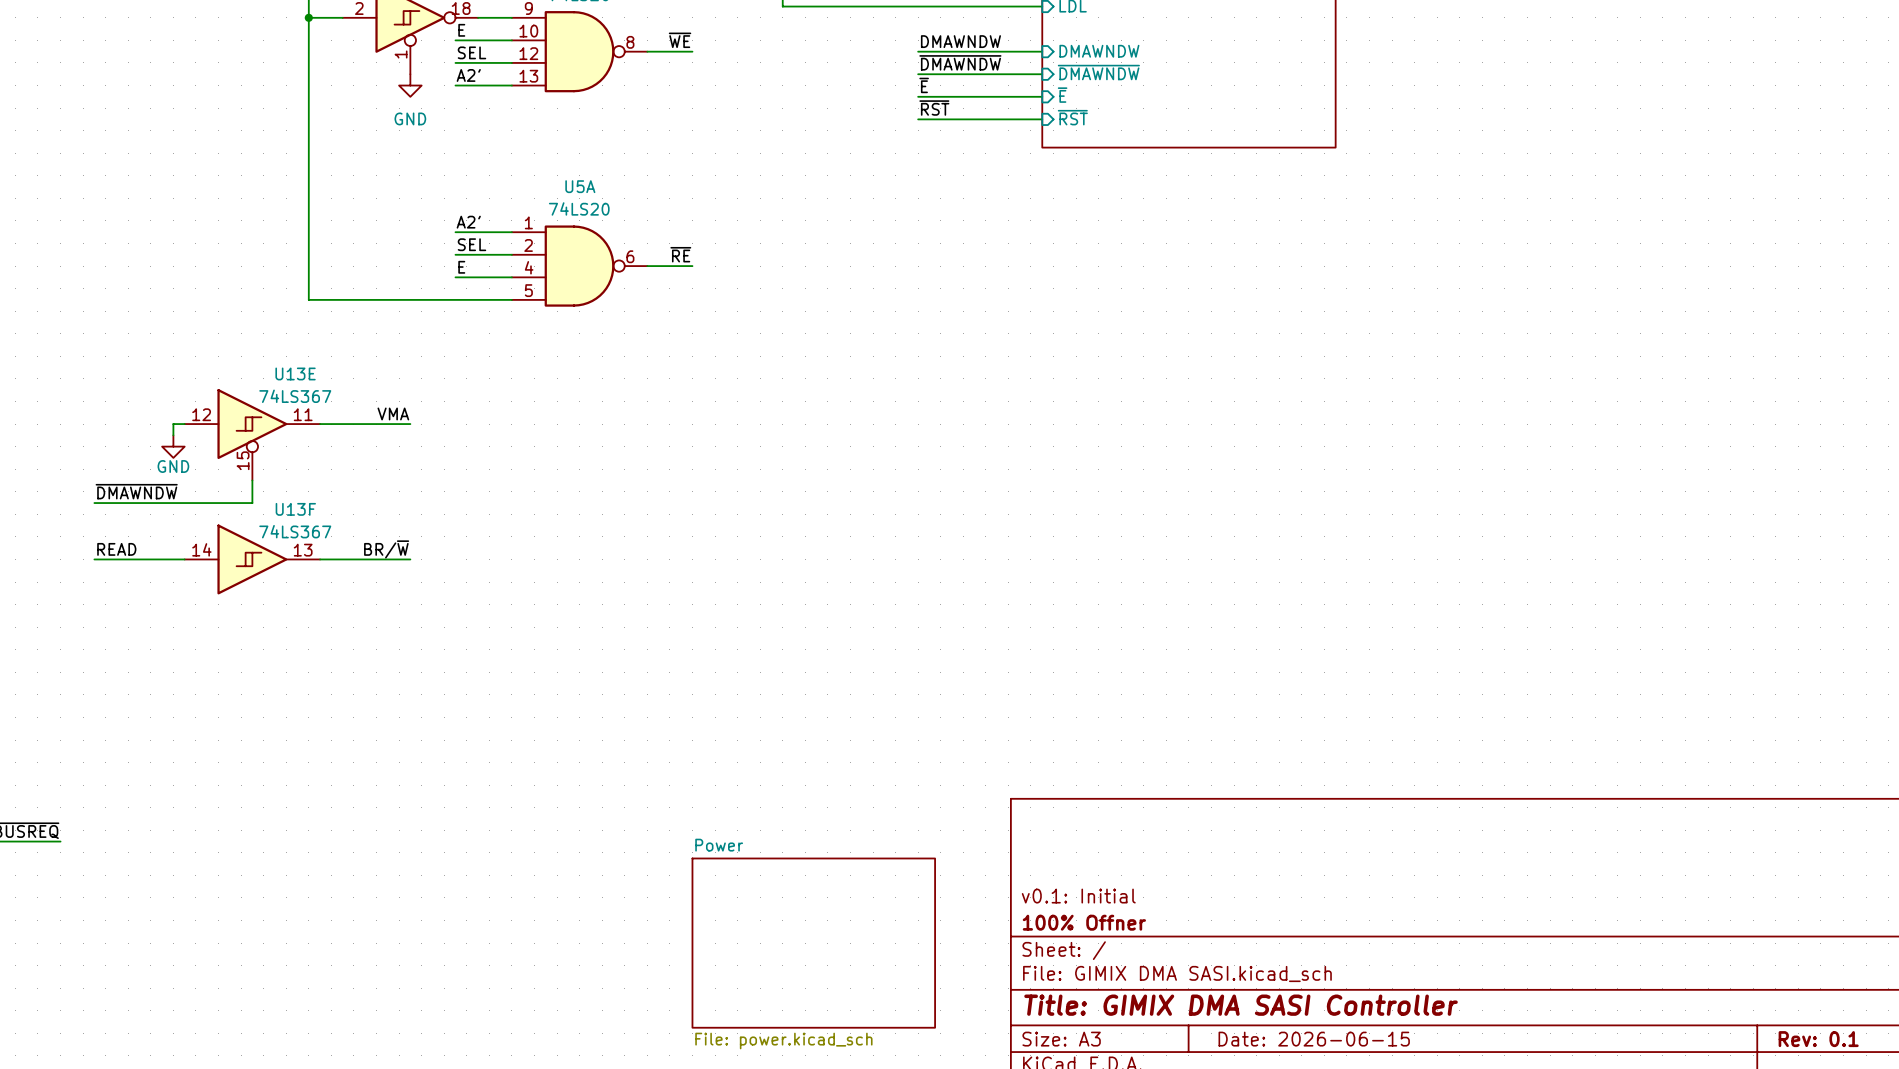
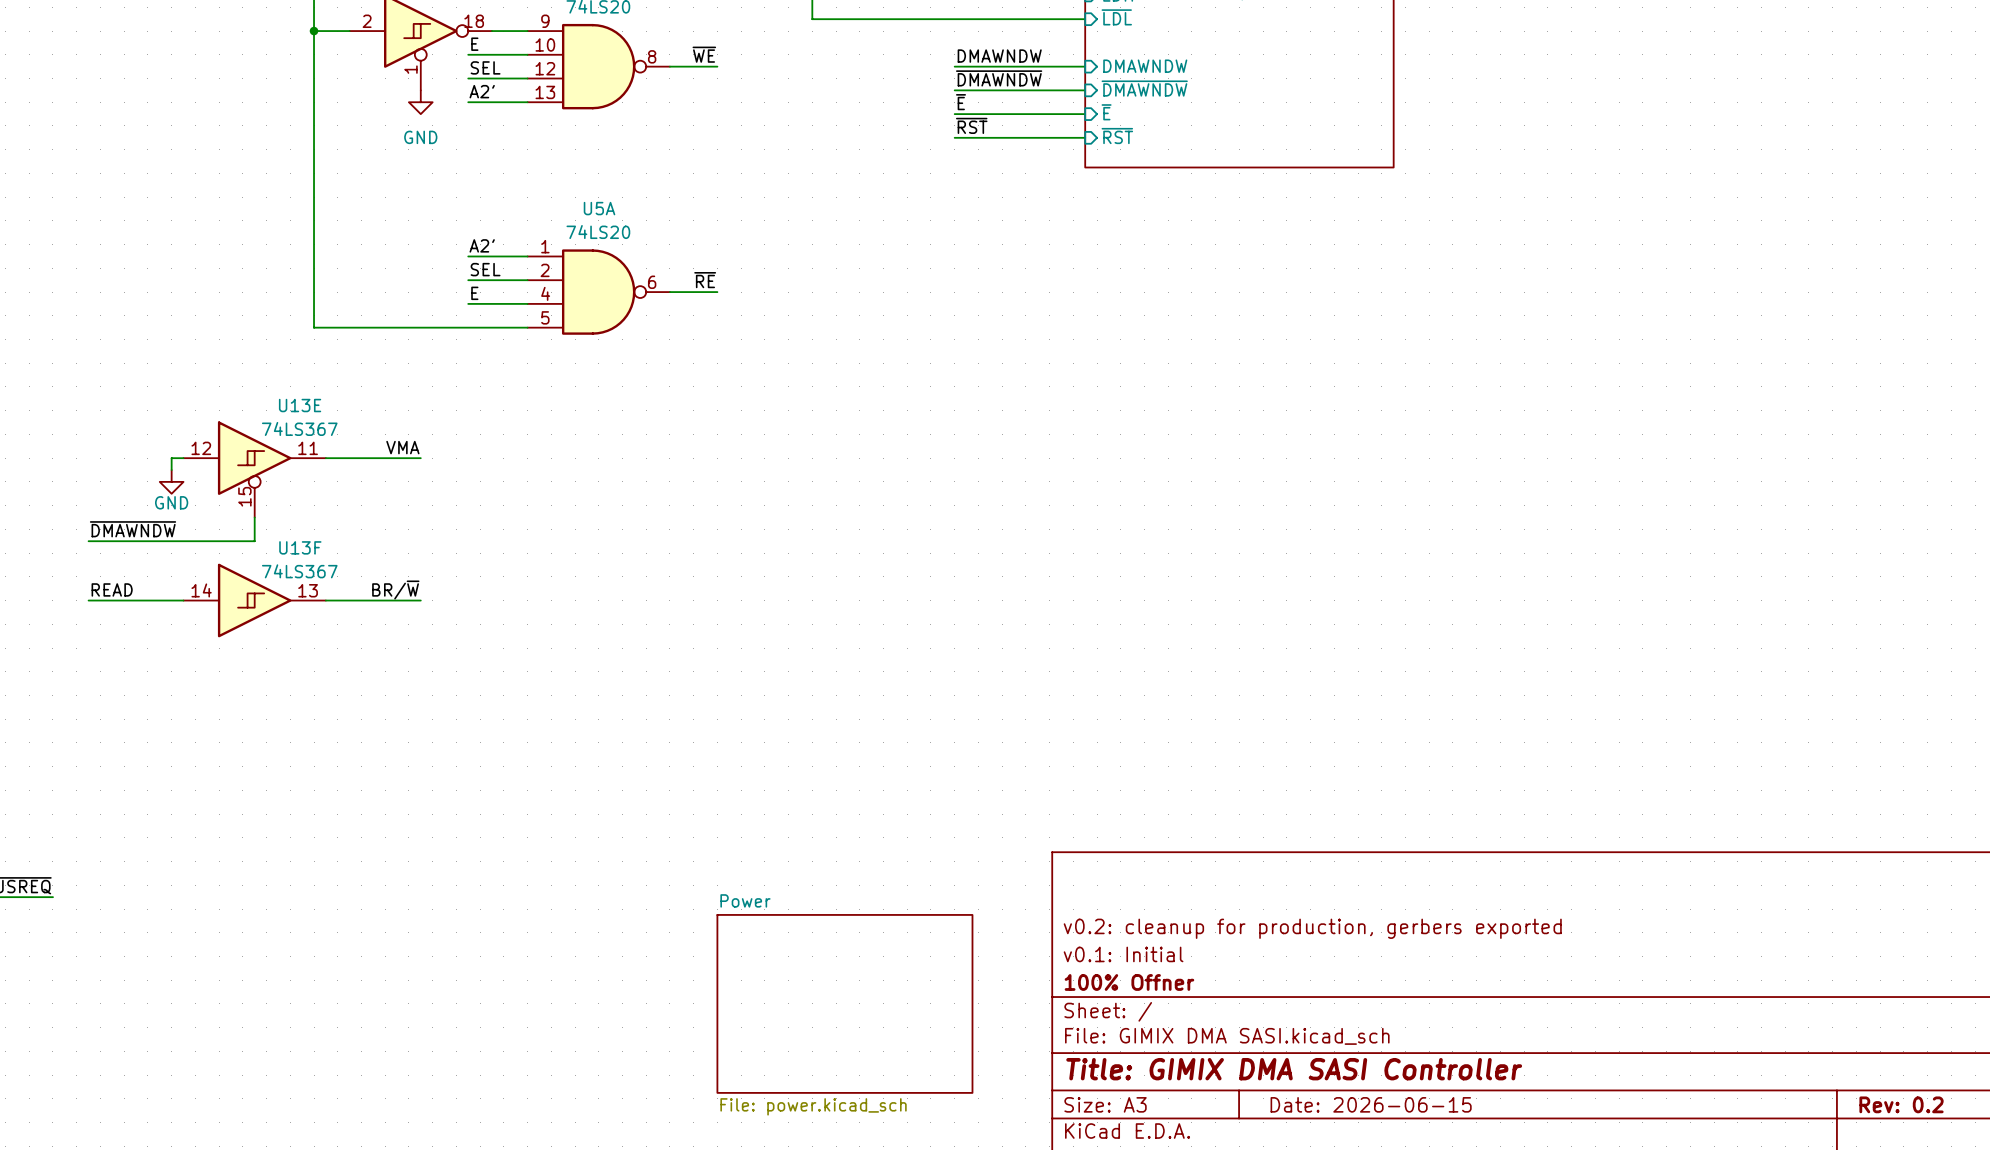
title block: none -> v0.2: cleanup for production, gerbers exported (1312, 928)
title block: Rev: 0.1 (1818, 1039) -> Rev: 0.2 (1901, 1104)

